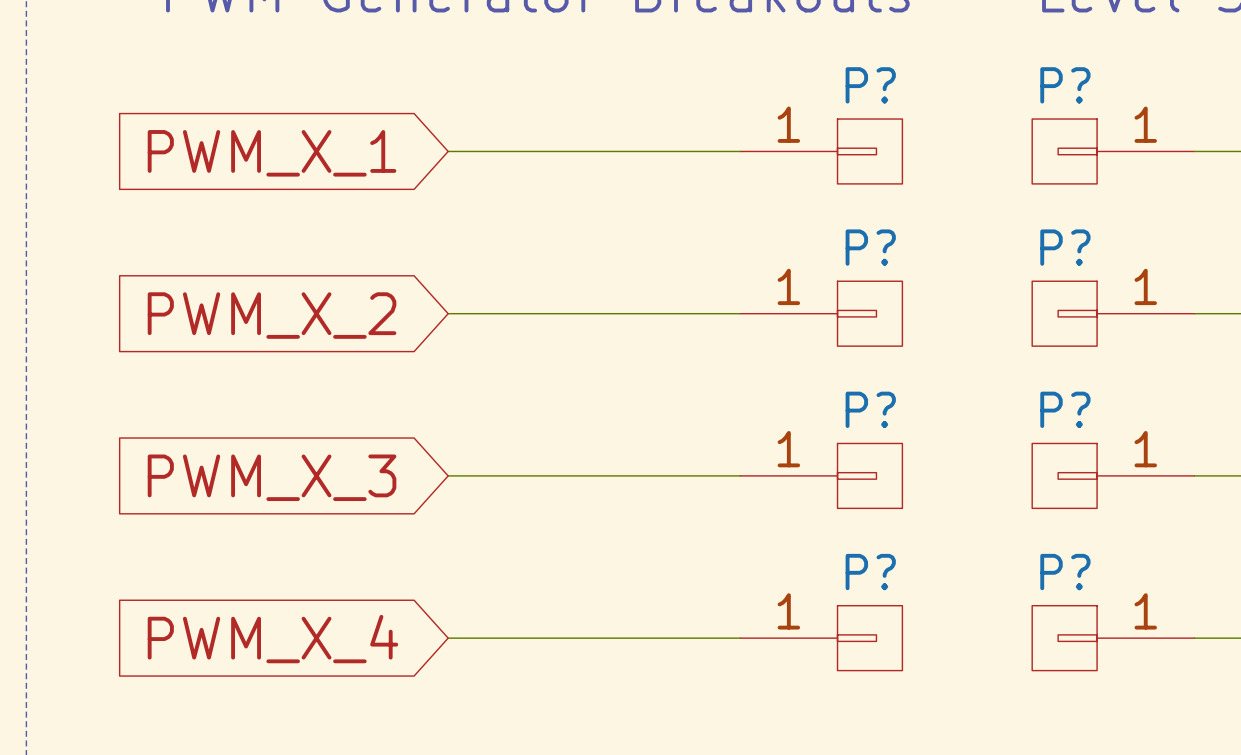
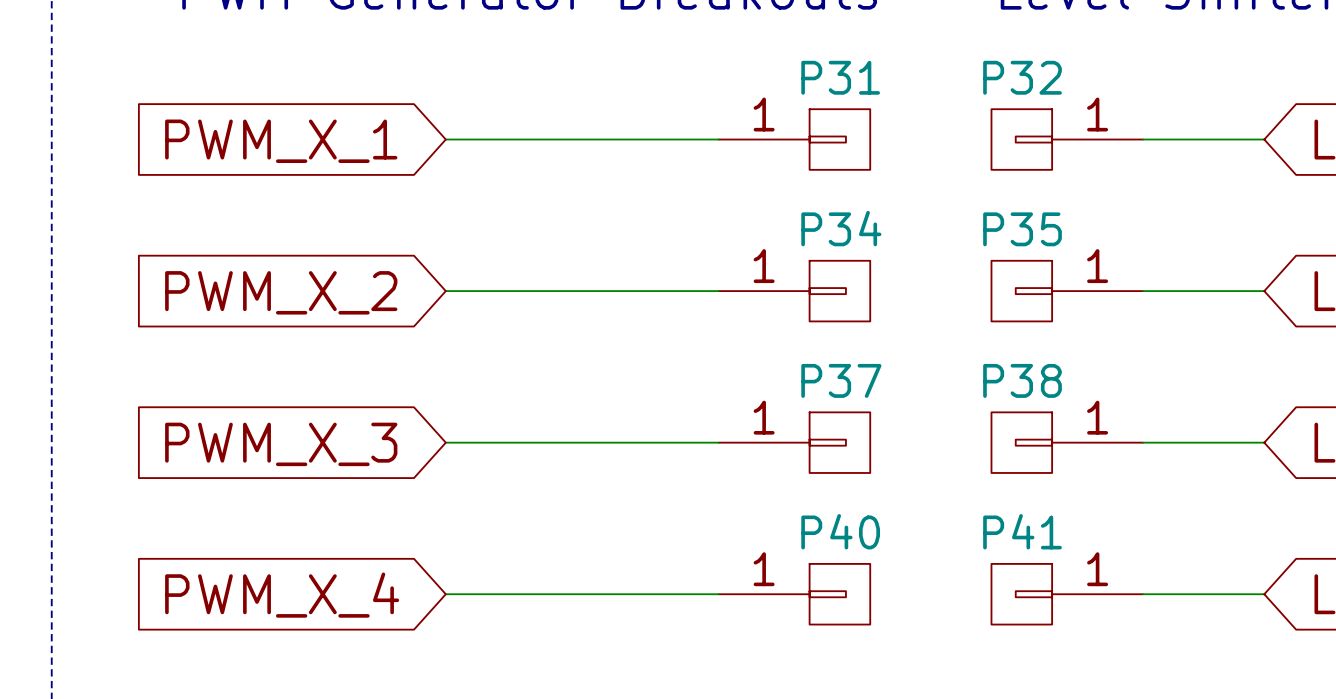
P? name: P? (870, 85) -> P31 (840, 77)
P? name: P? (1065, 85) -> P32 (1022, 77)
P? name: P? (870, 247) -> P34 (841, 228)
P? name: P? (1065, 247) -> P35 (1022, 229)
P? name: P? (870, 409) -> P37 (841, 380)
P? name: P? (1065, 409) -> P38 (1022, 380)
P? name: P? (870, 572) -> P40 (840, 531)
P? name: P? (1065, 572) -> P41 (1022, 531)

